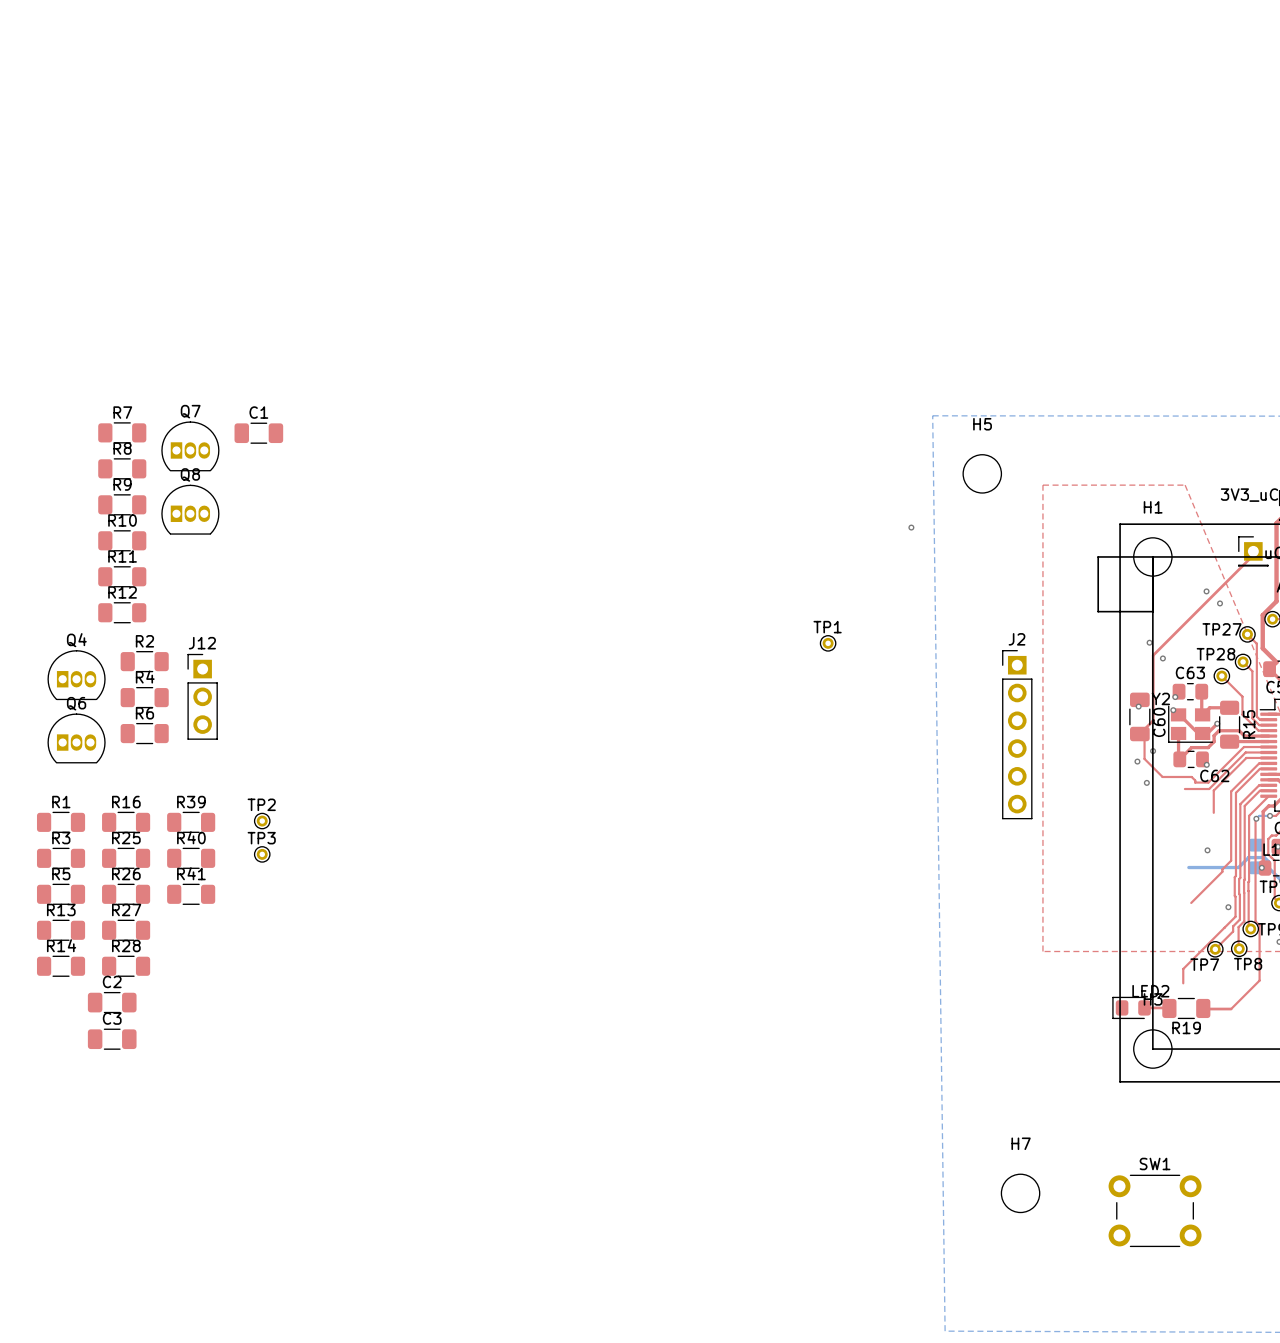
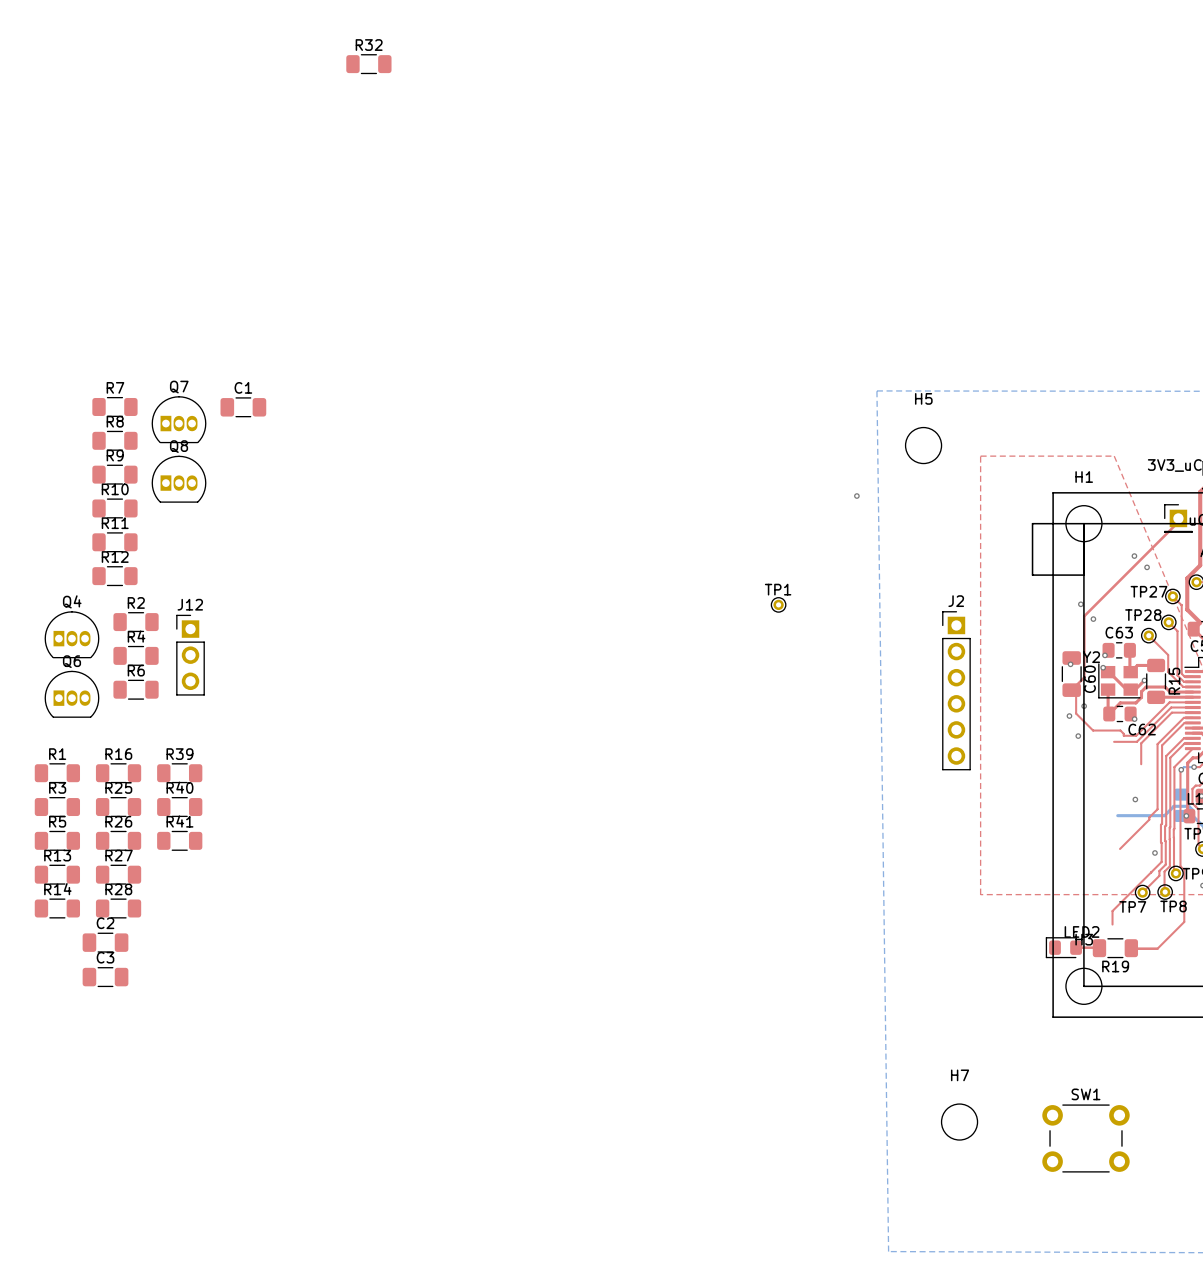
R32: none -> (368, 64)
TP2: (262, 821) -> none
TP3: (262, 854) -> none

